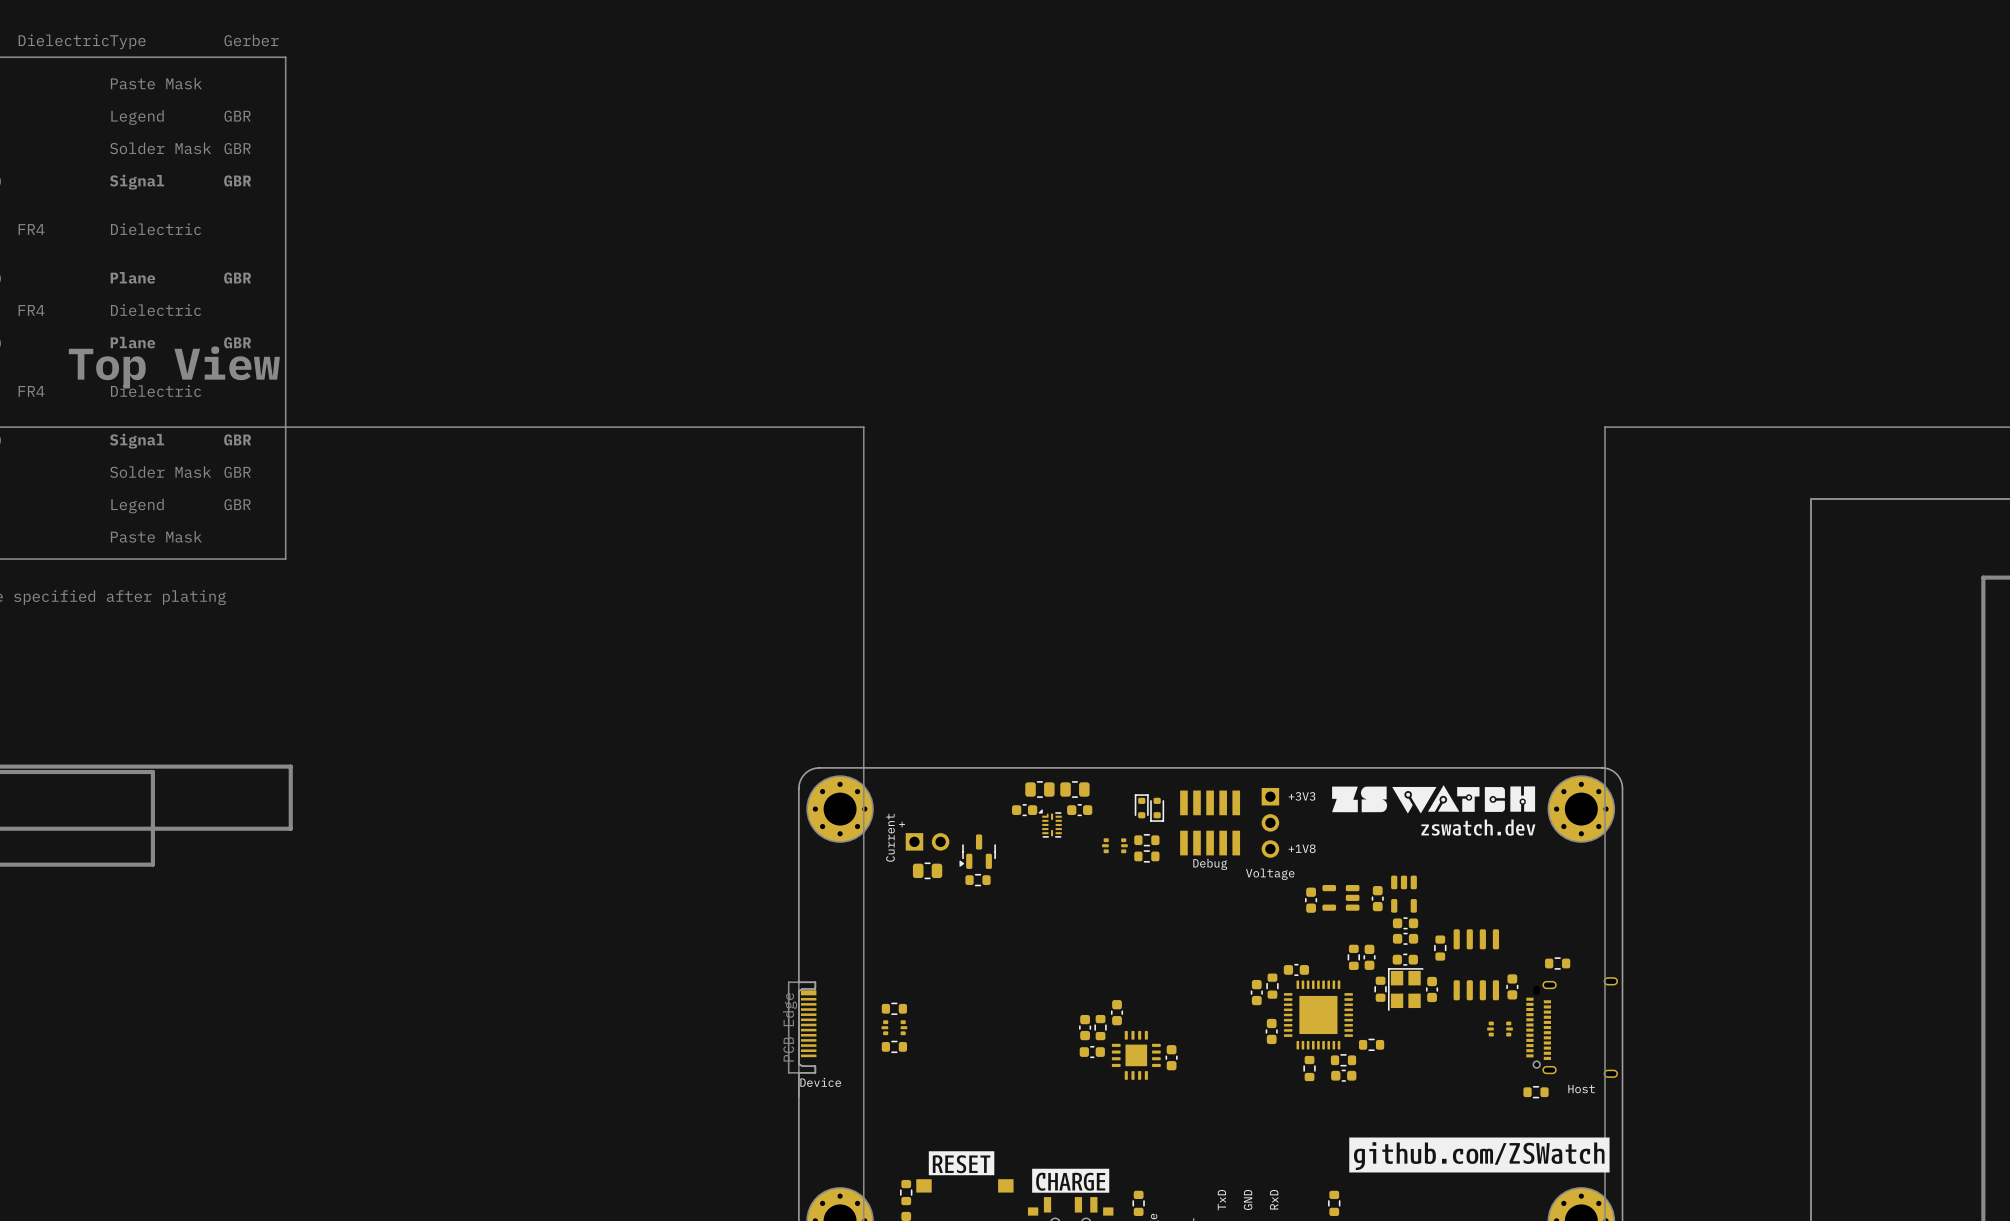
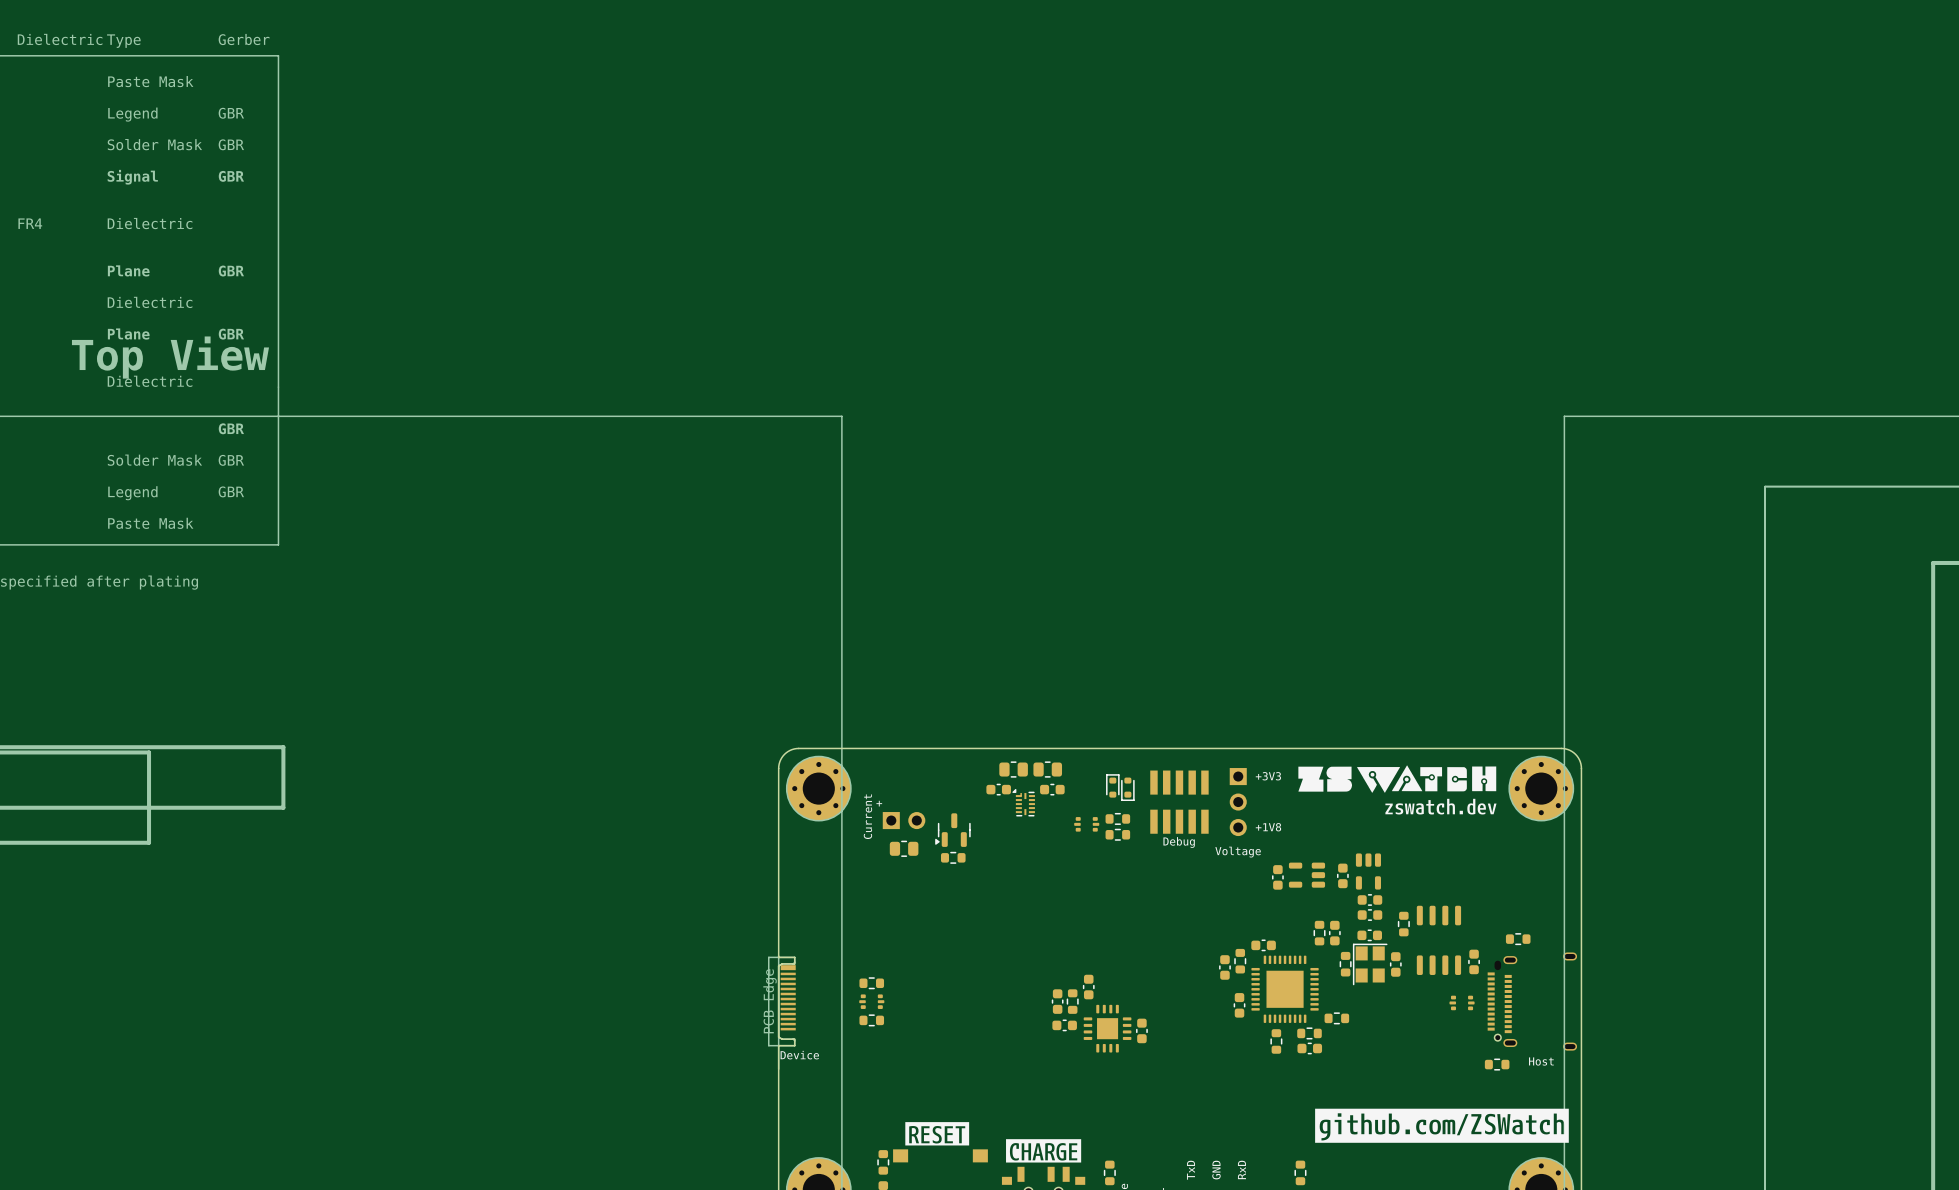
text: FR4 (31, 310) -> none
text: FR4 (31, 391) -> none
text: Signal (137, 441) -> none

